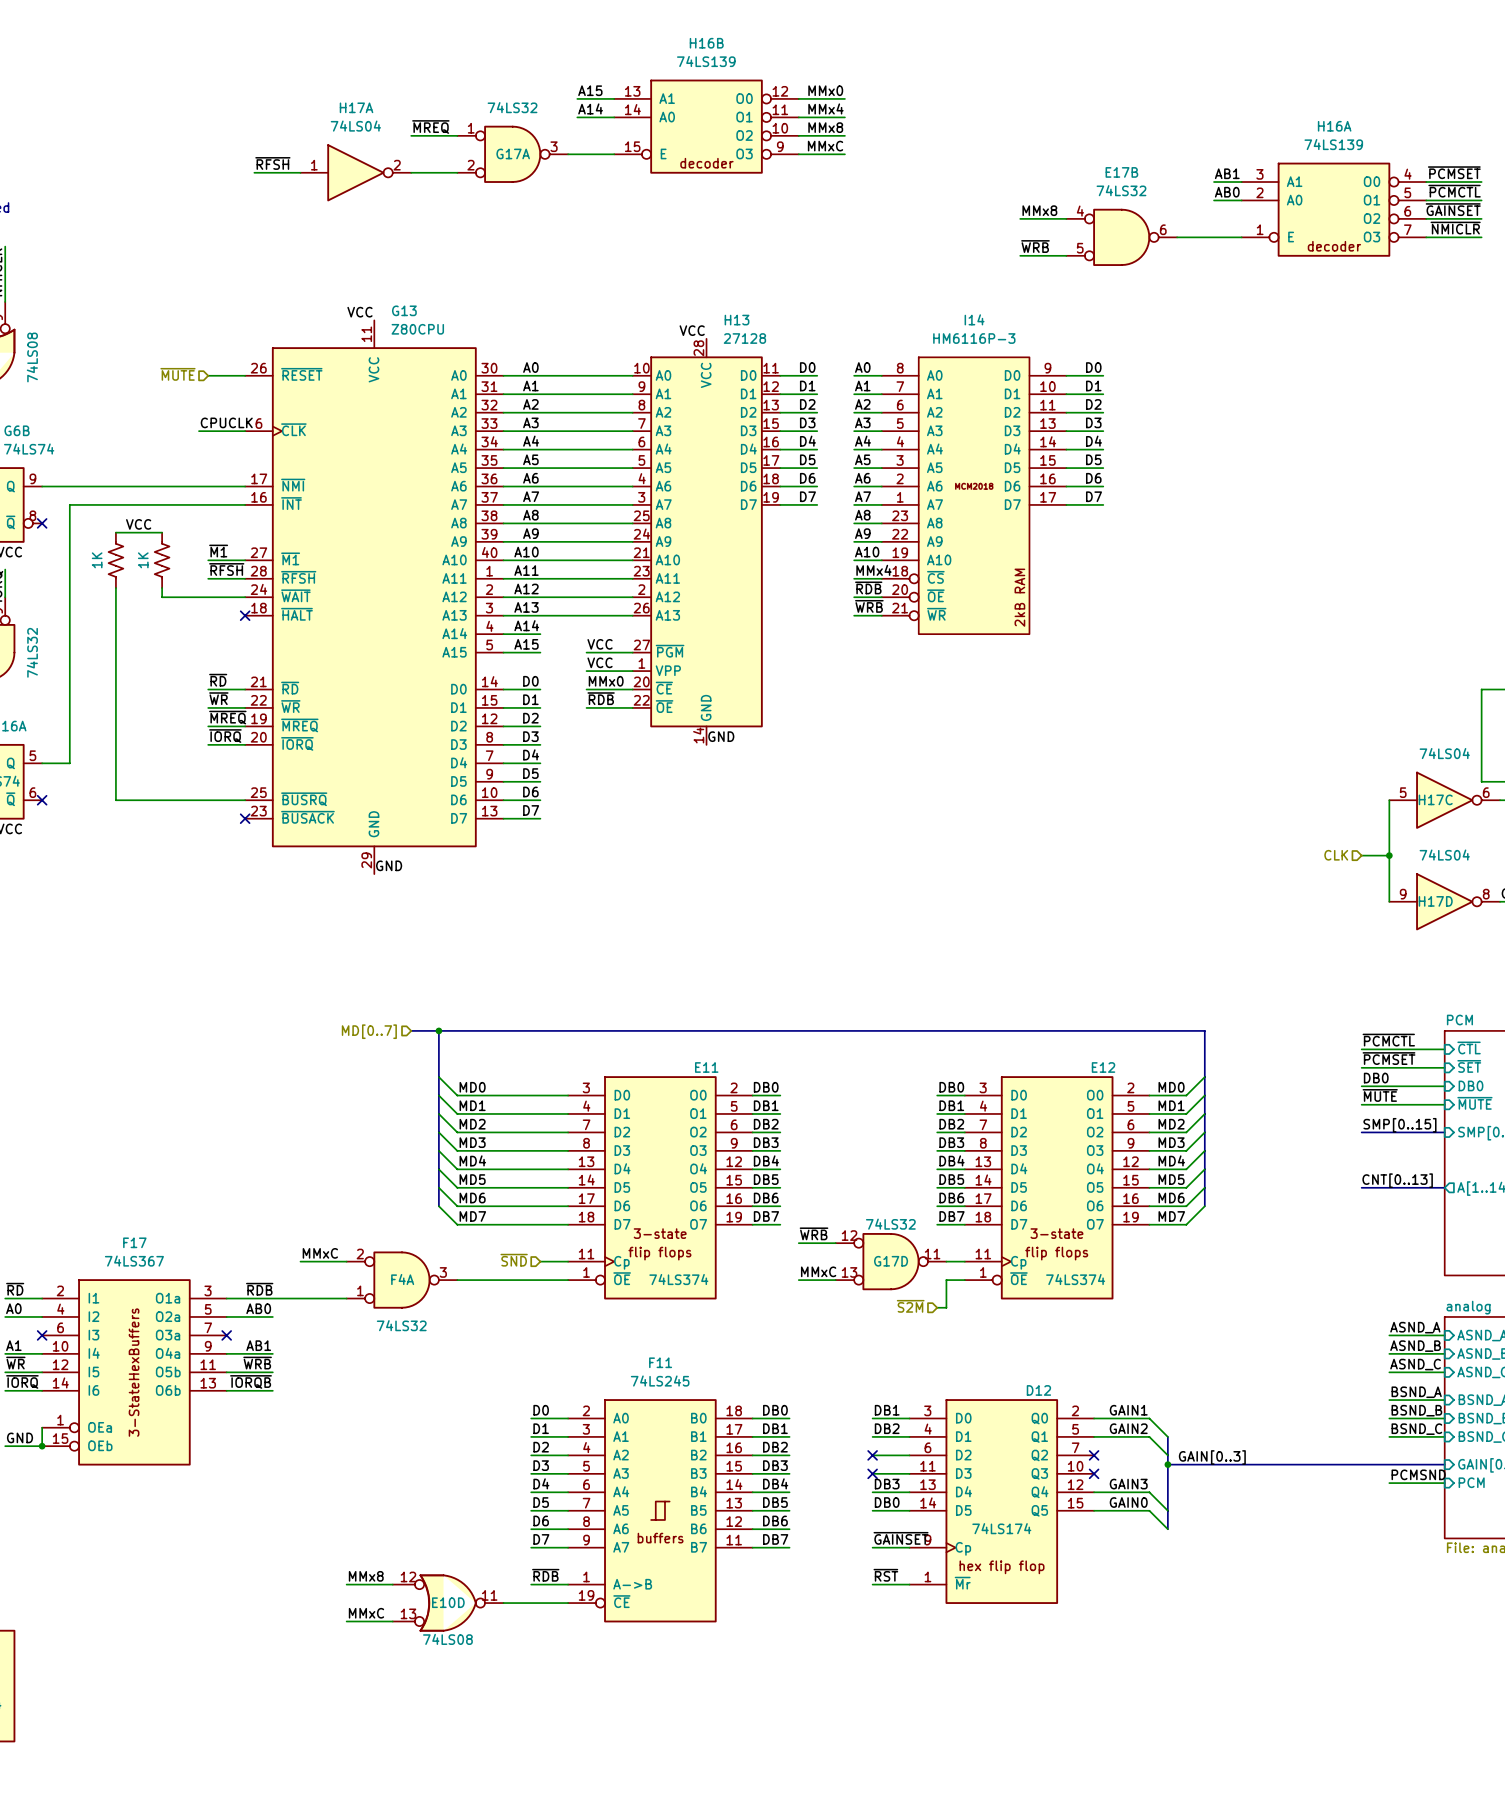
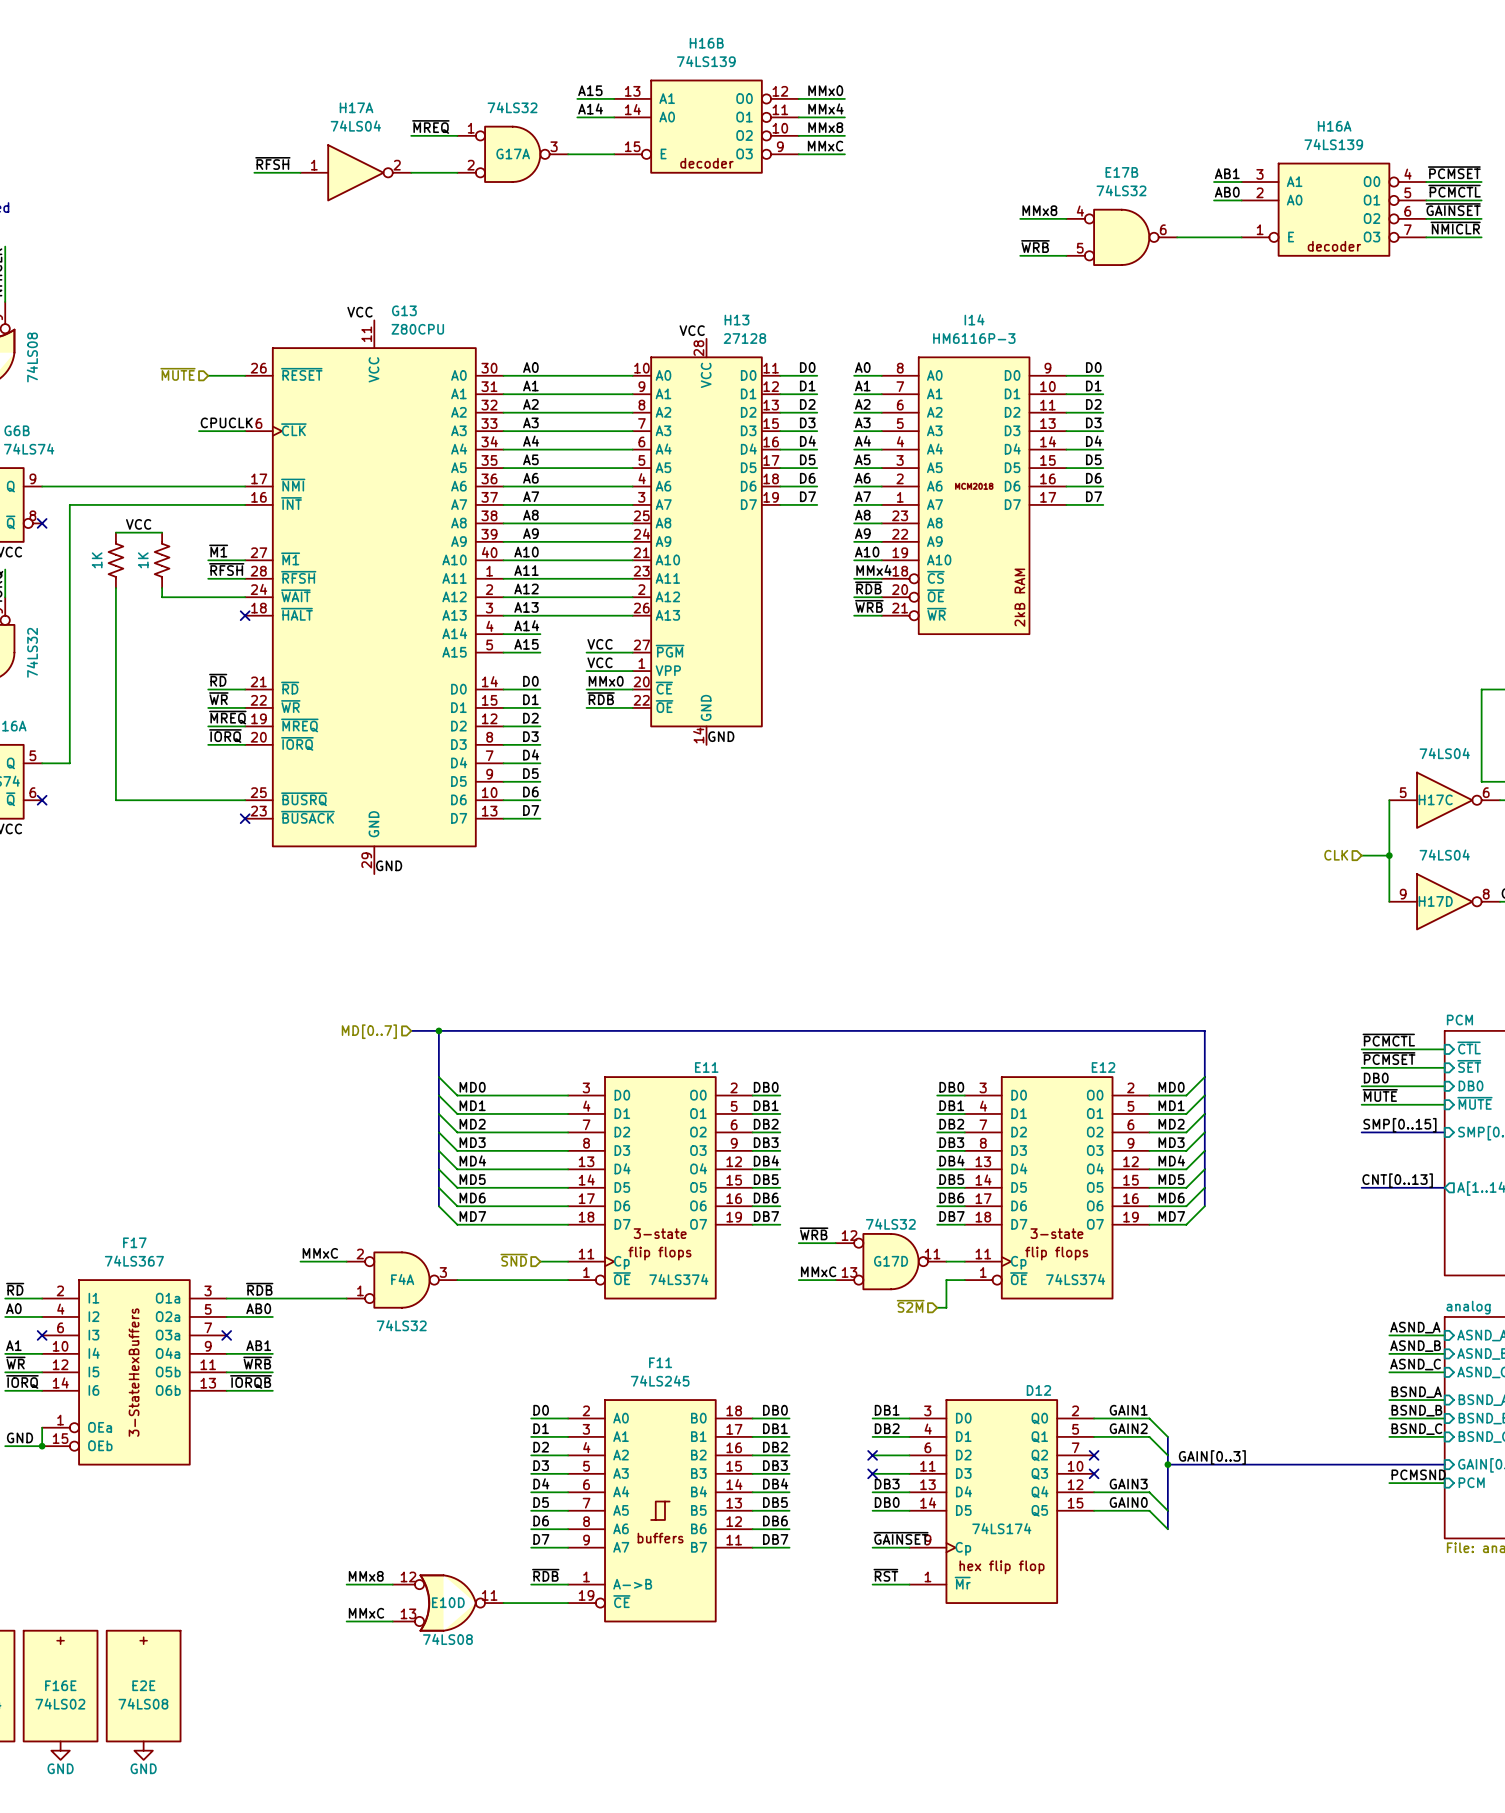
F16E: none -> 74LS02 (60, 1686)
E2E: none -> 74LS08 (143, 1686)
power symbol: none -> GND (60, 1750)
power symbol: none -> GND (143, 1750)

